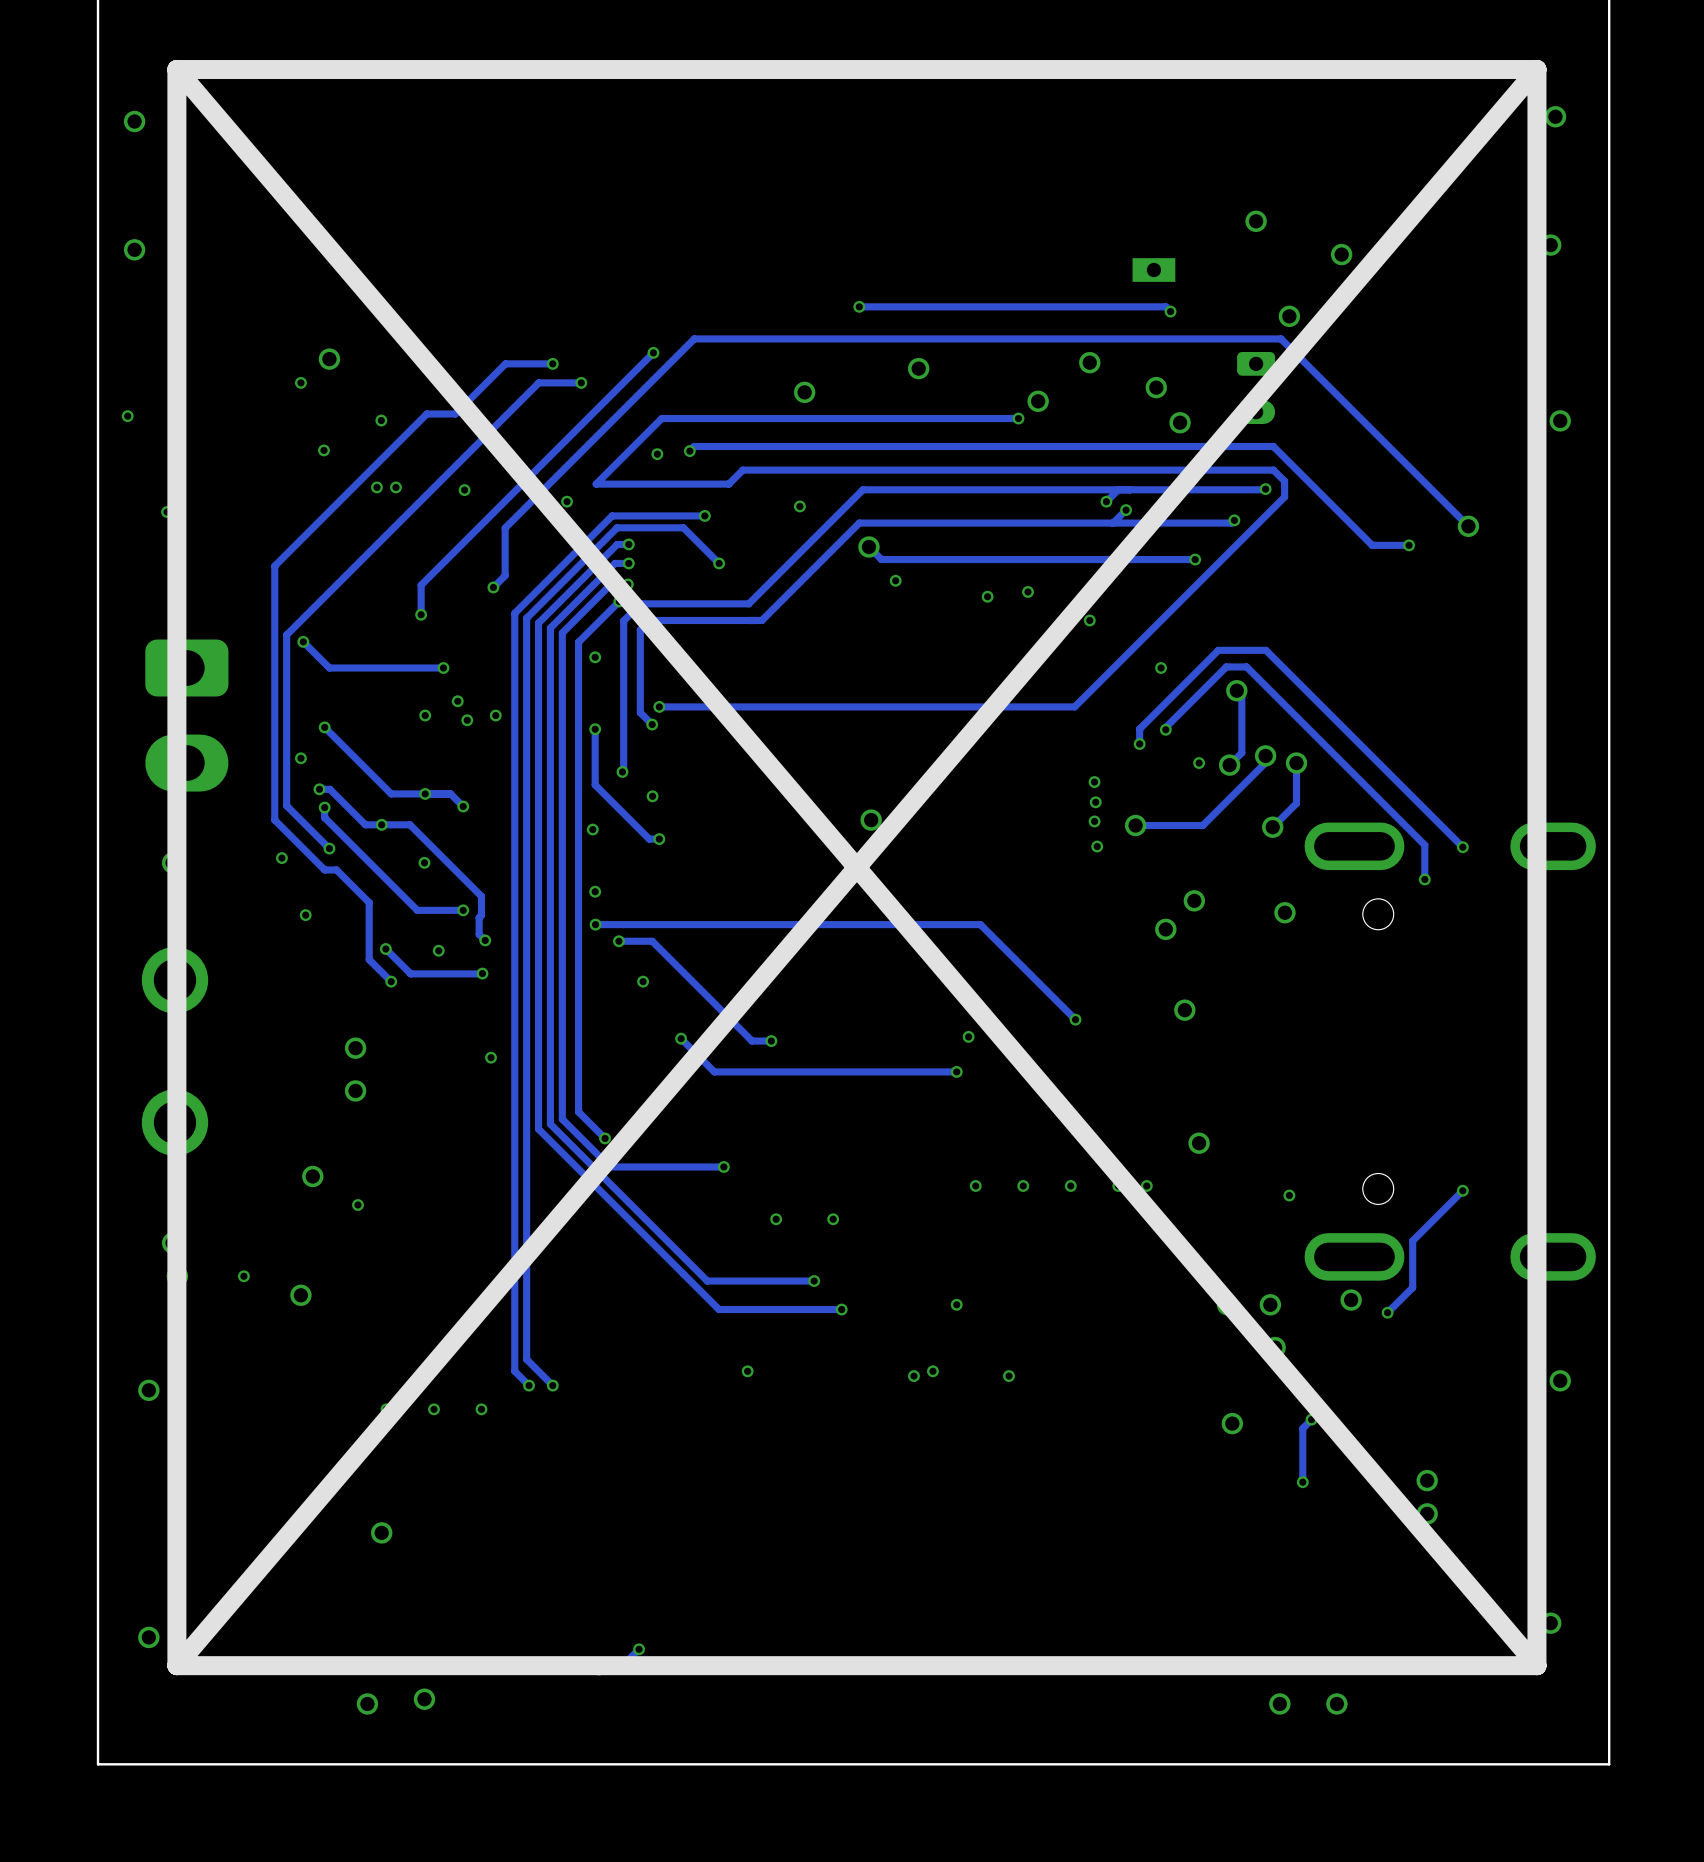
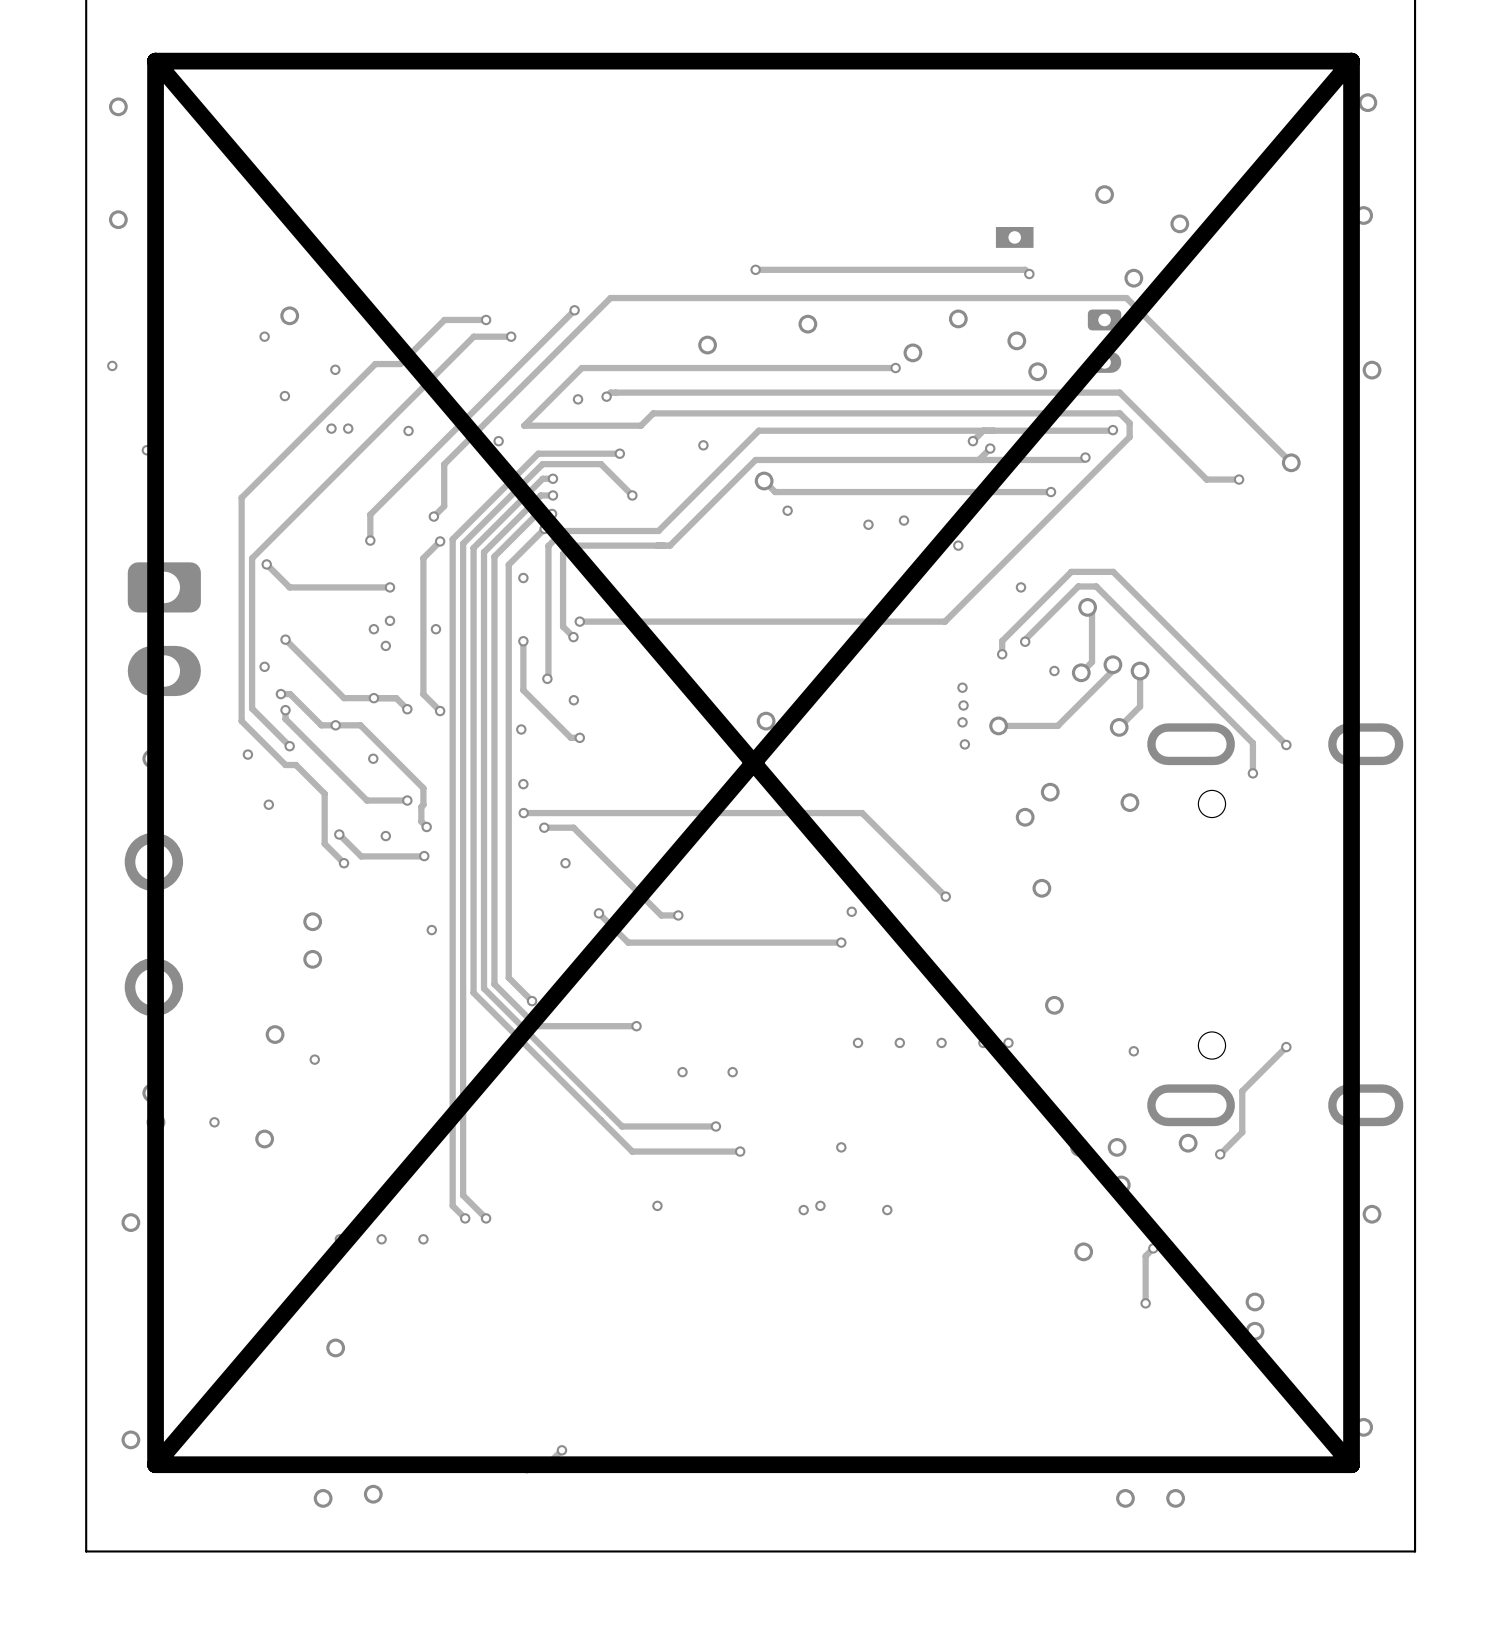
track: none -> (440, 541) (423, 558) (423, 694) (440, 711)
via: none -> (440, 541)
via: (457, 701) -> none
via: none -> (389, 620)
via: (467, 720) -> none
via: none -> (385, 645)
via: none -> (440, 711)

